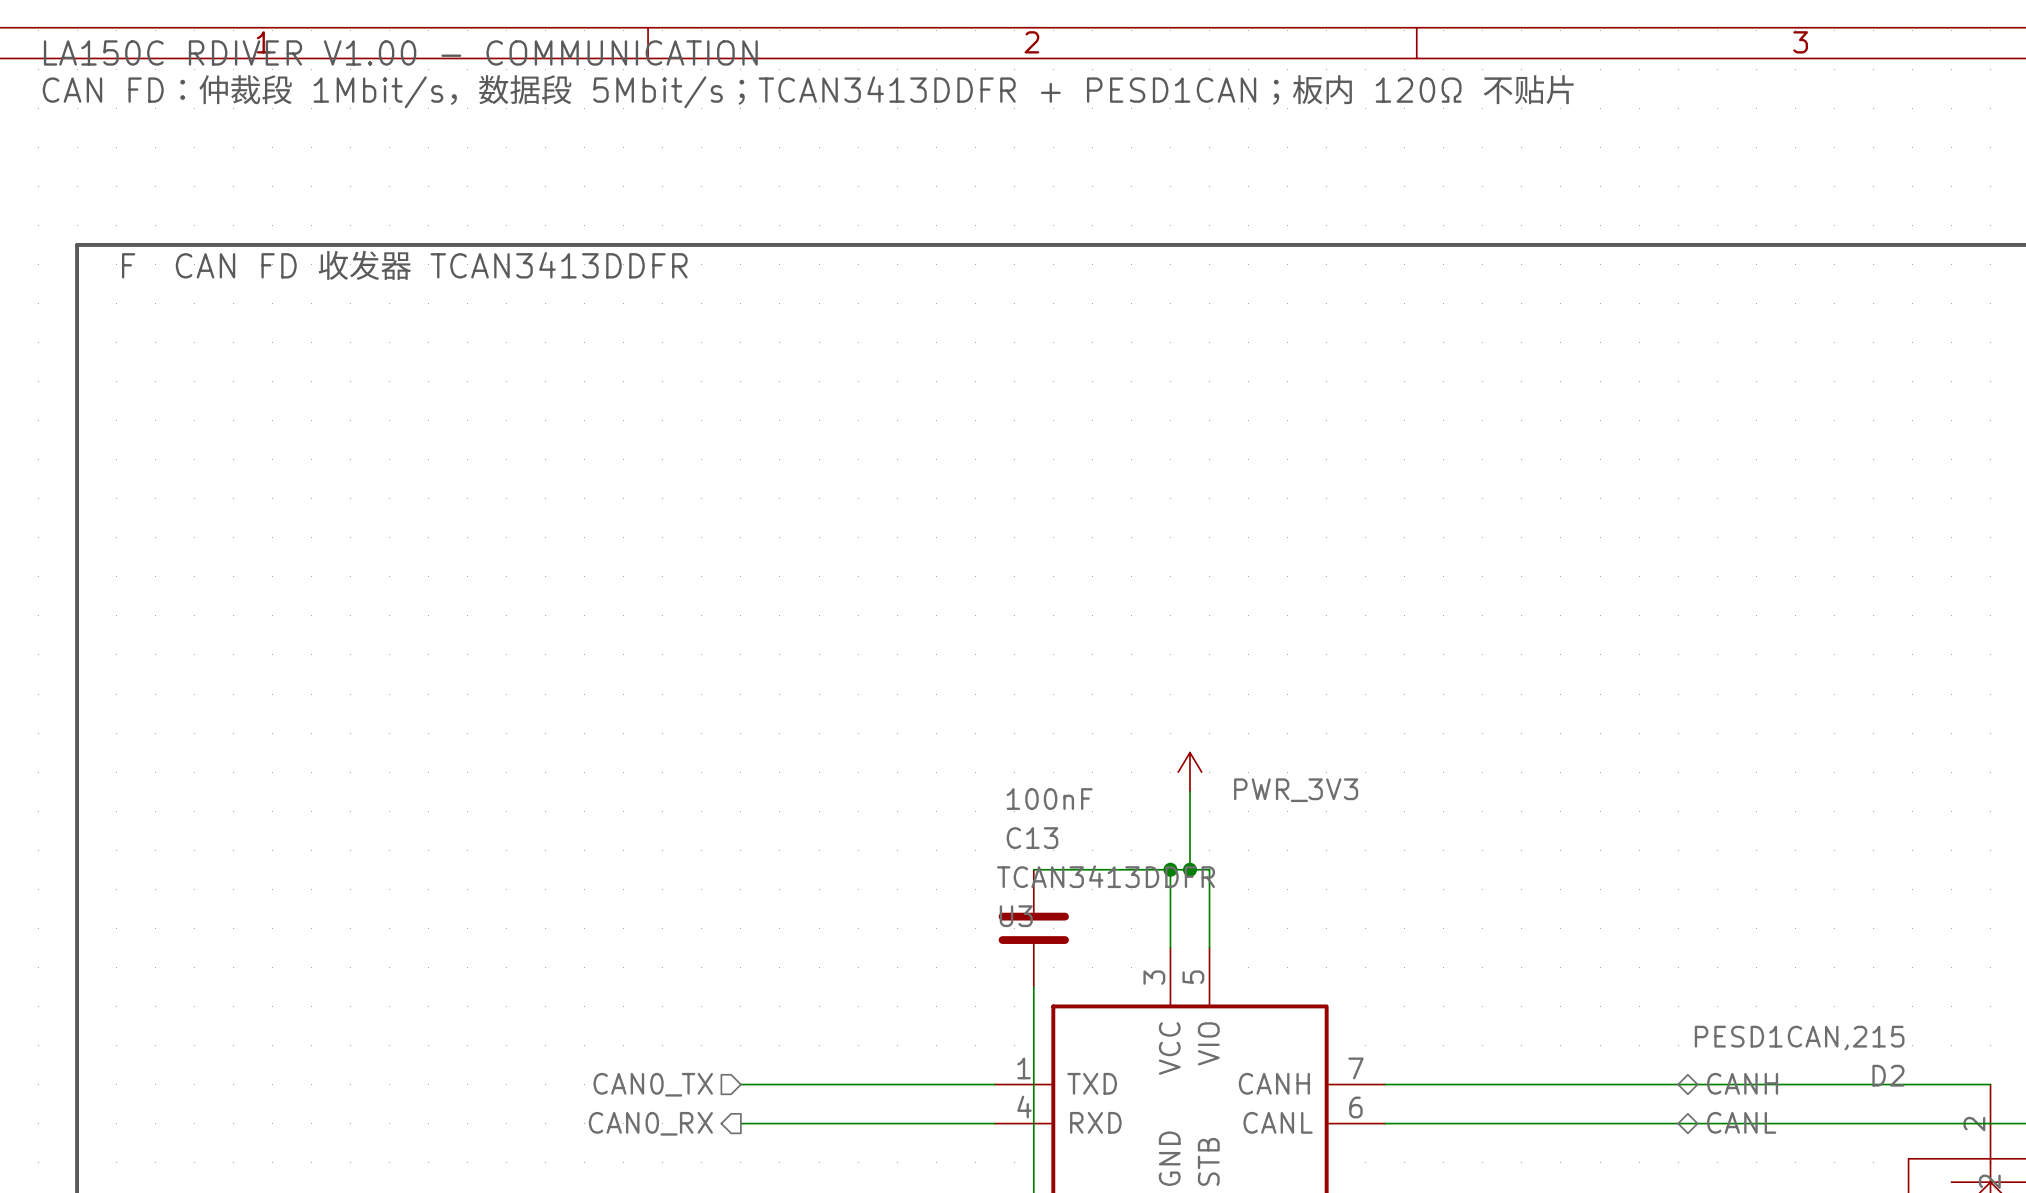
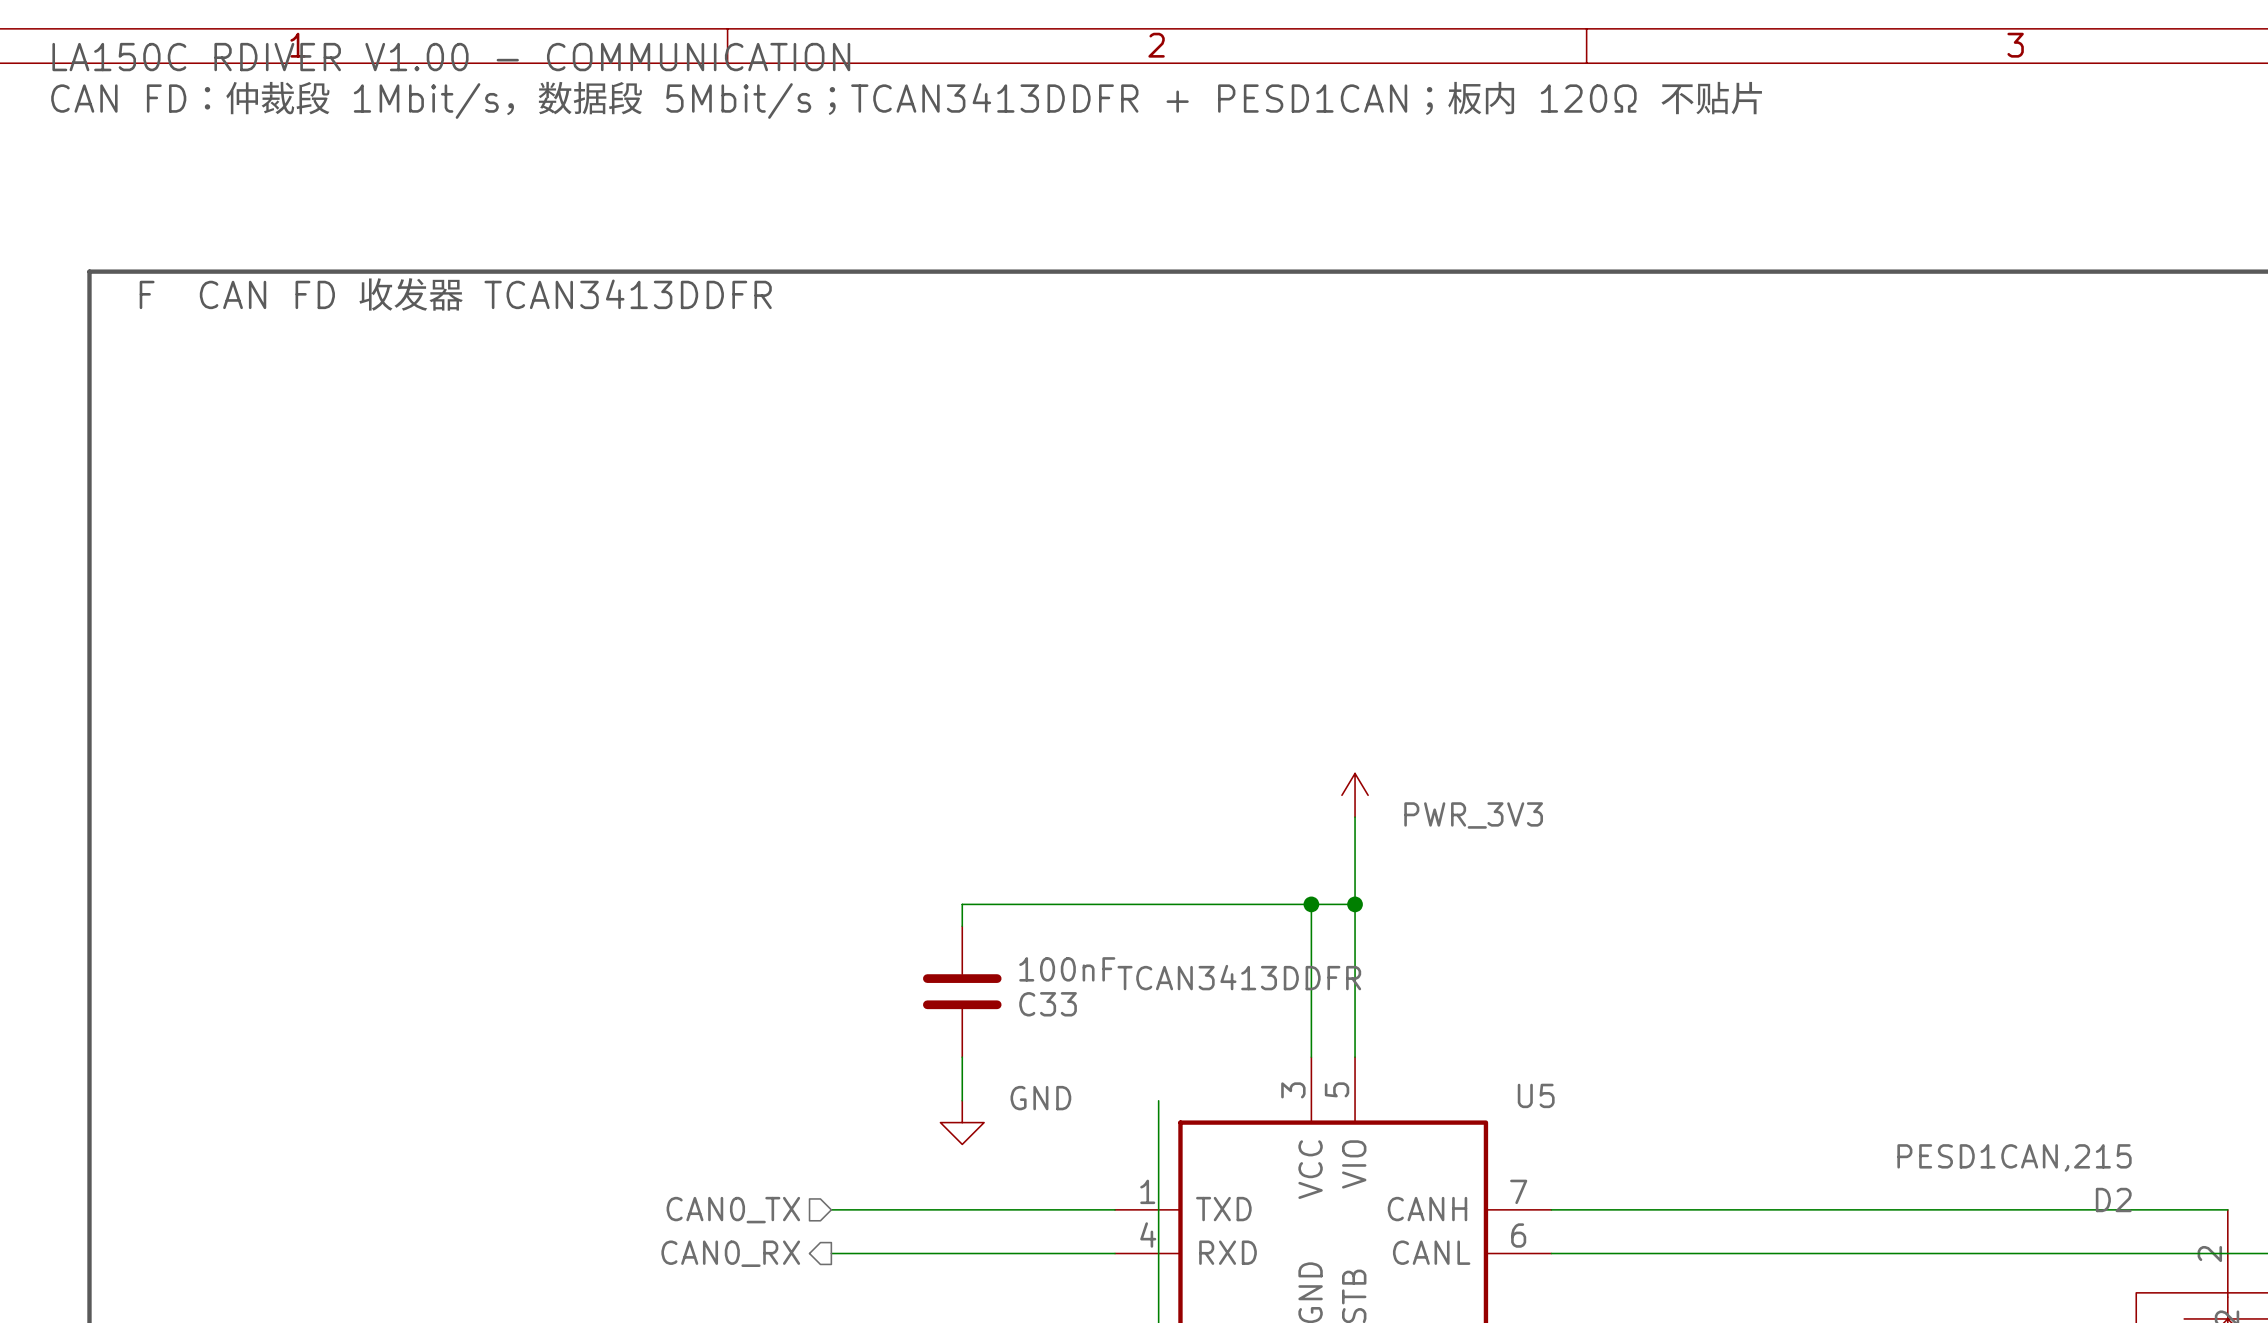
power symbol position: PWR_3V3 (1189, 772) -> PWR_3V3 (1355, 795)
wire: (1189, 791) (1189, 869) -> none
wire: none -> (1311, 904) (1311, 969)
junction: none -> (1311, 904)
wire: none -> (1355, 904) (962, 904) (962, 926)
junction: none -> (1355, 904)
wire: (1033, 869) (1209, 869) -> (1355, 817) (1355, 969)
junction: (1170, 869) -> none
junction: (1189, 869) -> none
C33: none -> 100nF (962, 991)
U3 name: U3 (1016, 916) -> U5 (1536, 1095)
C13: 100nF (1033, 928) -> none
wire: none -> (962, 1057) (962, 1100)
power symbol: none -> GND (962, 1122)
hierarchical label: CANH (1742, 1083) -> none
hierarchical label: CANL (1741, 1122) -> none

